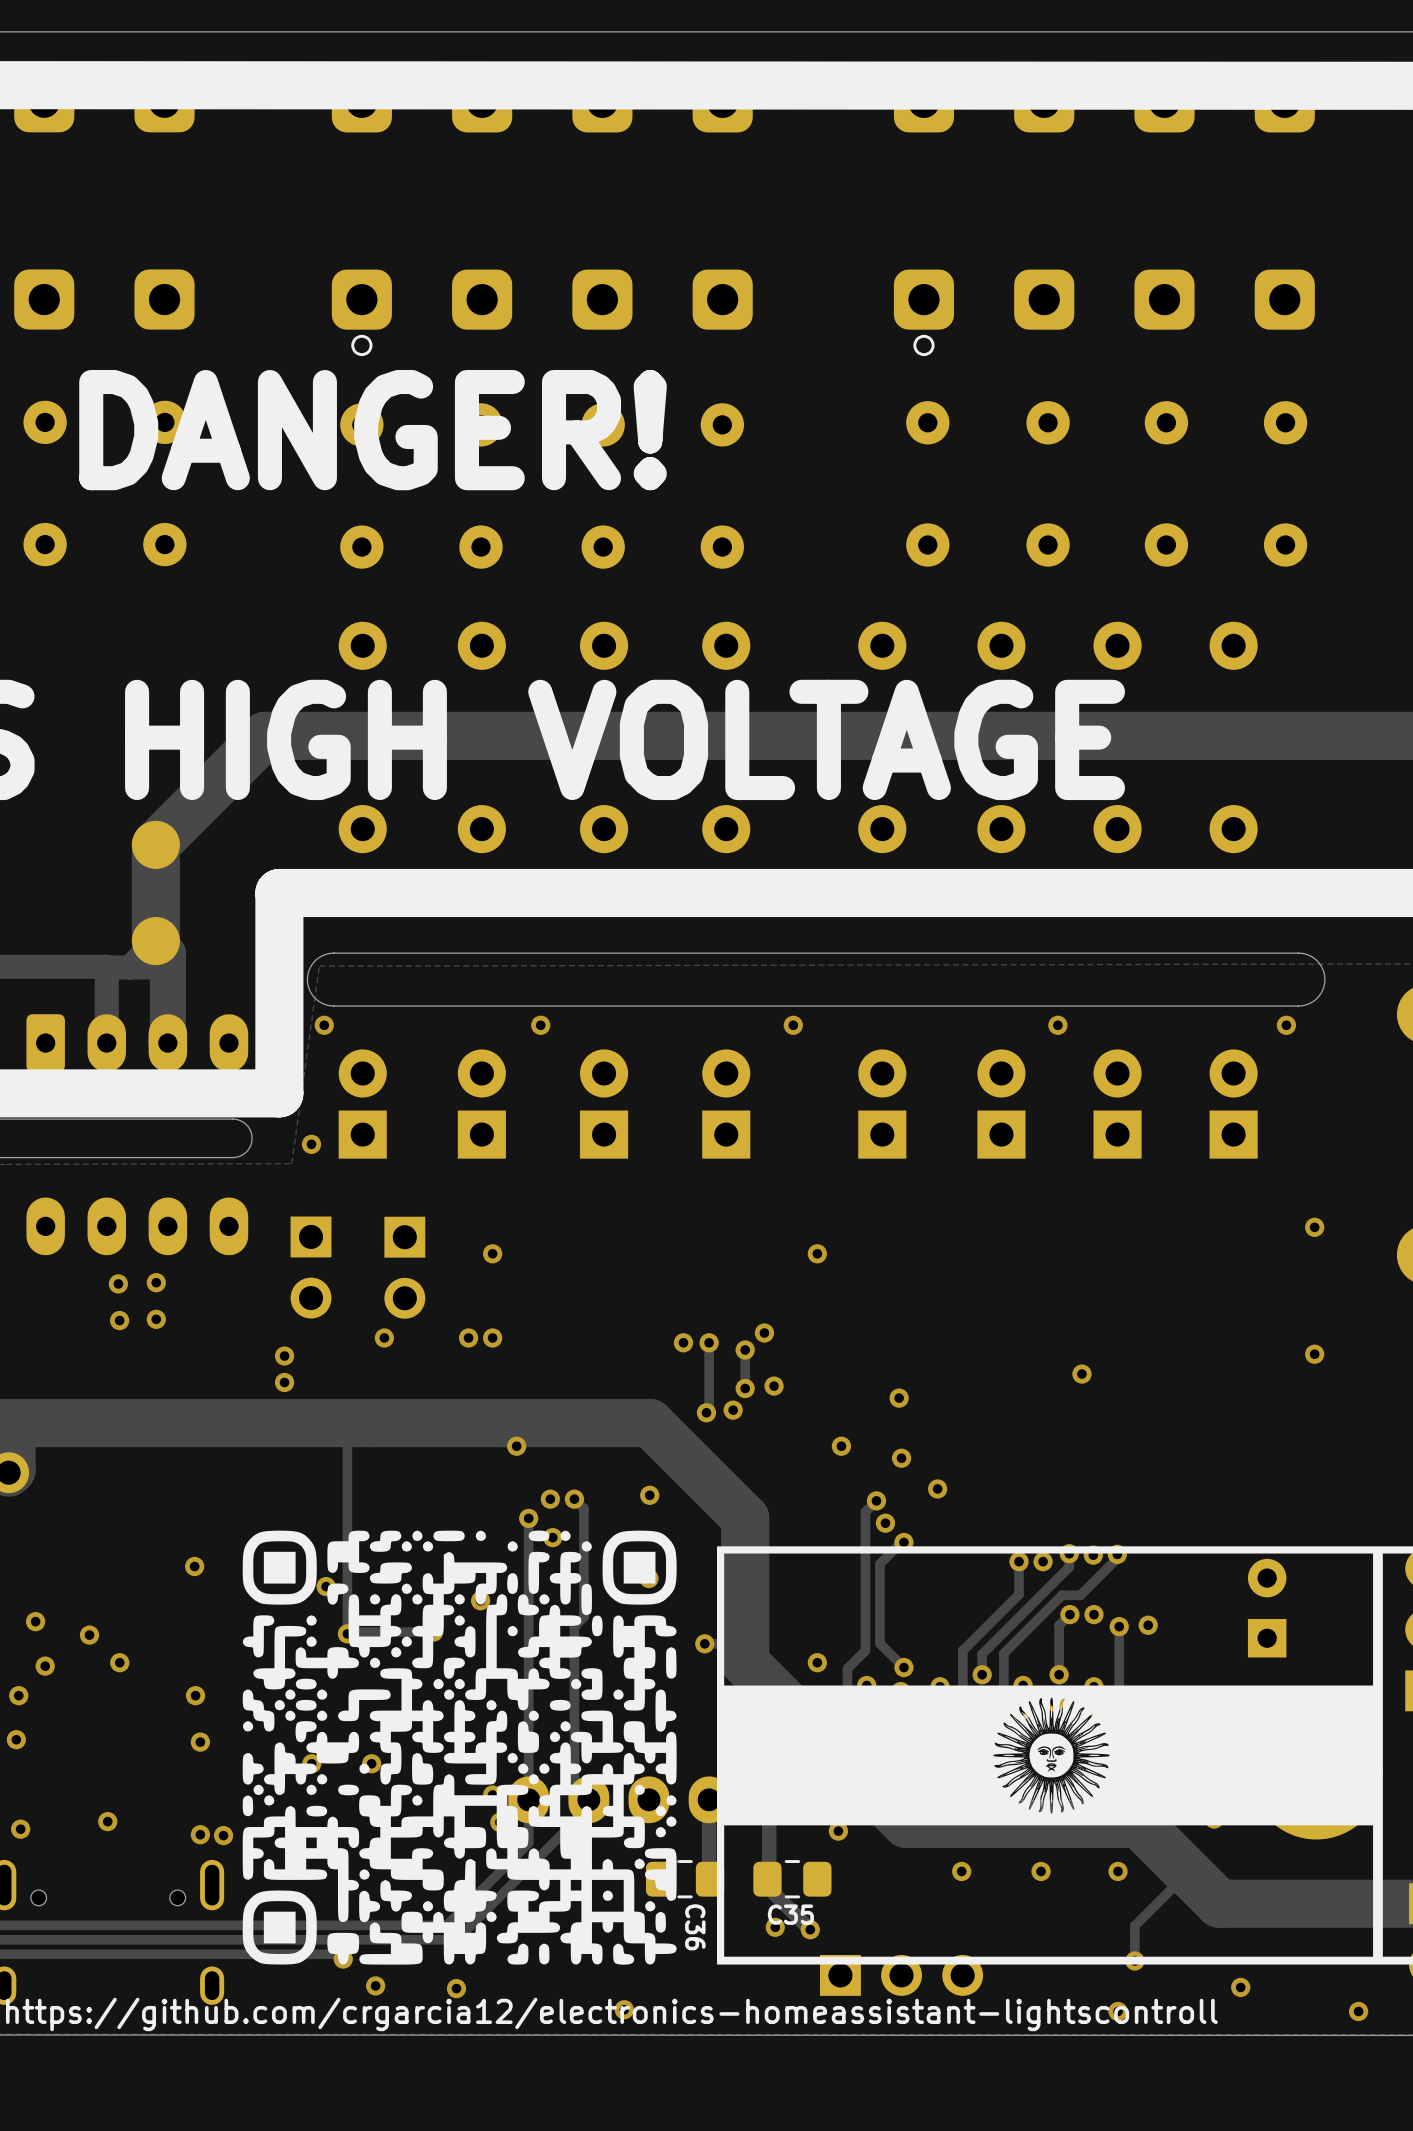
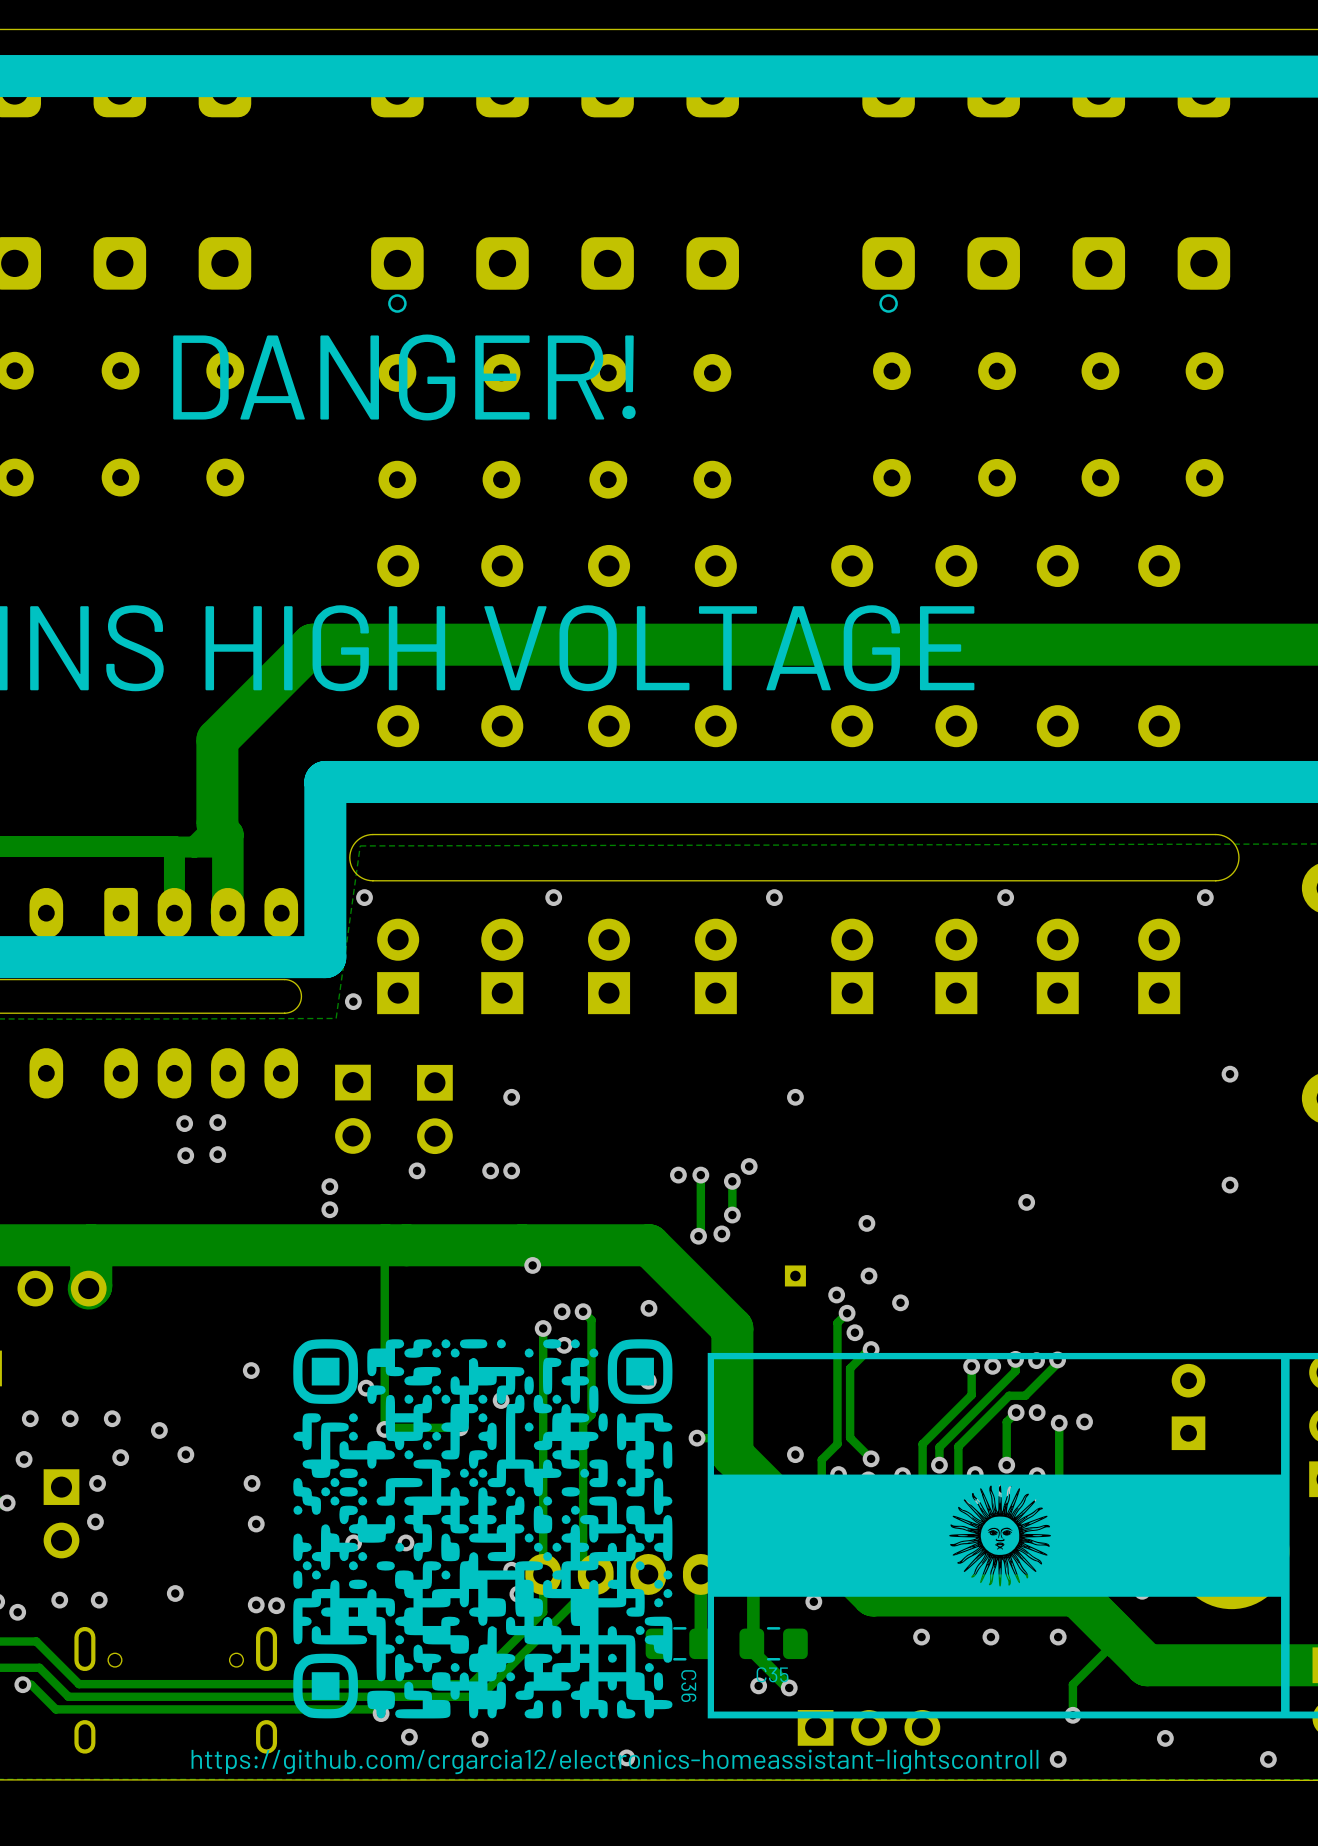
via: (774, 1386) -> none
via position: (841, 1446) -> (836, 1294)
part: none -> (795, 1275)

